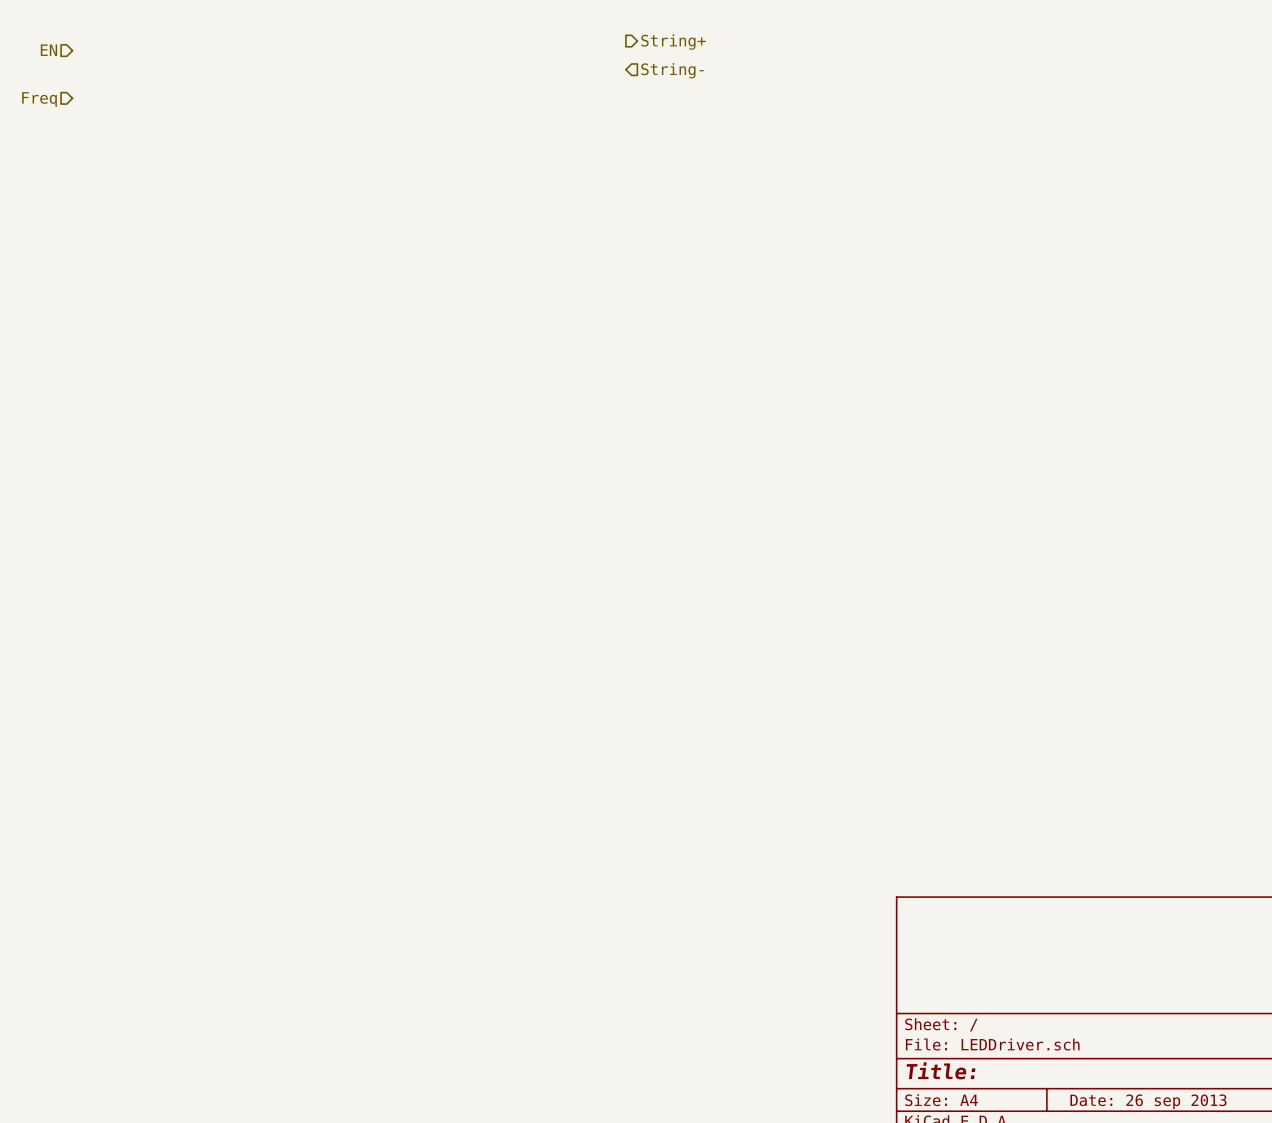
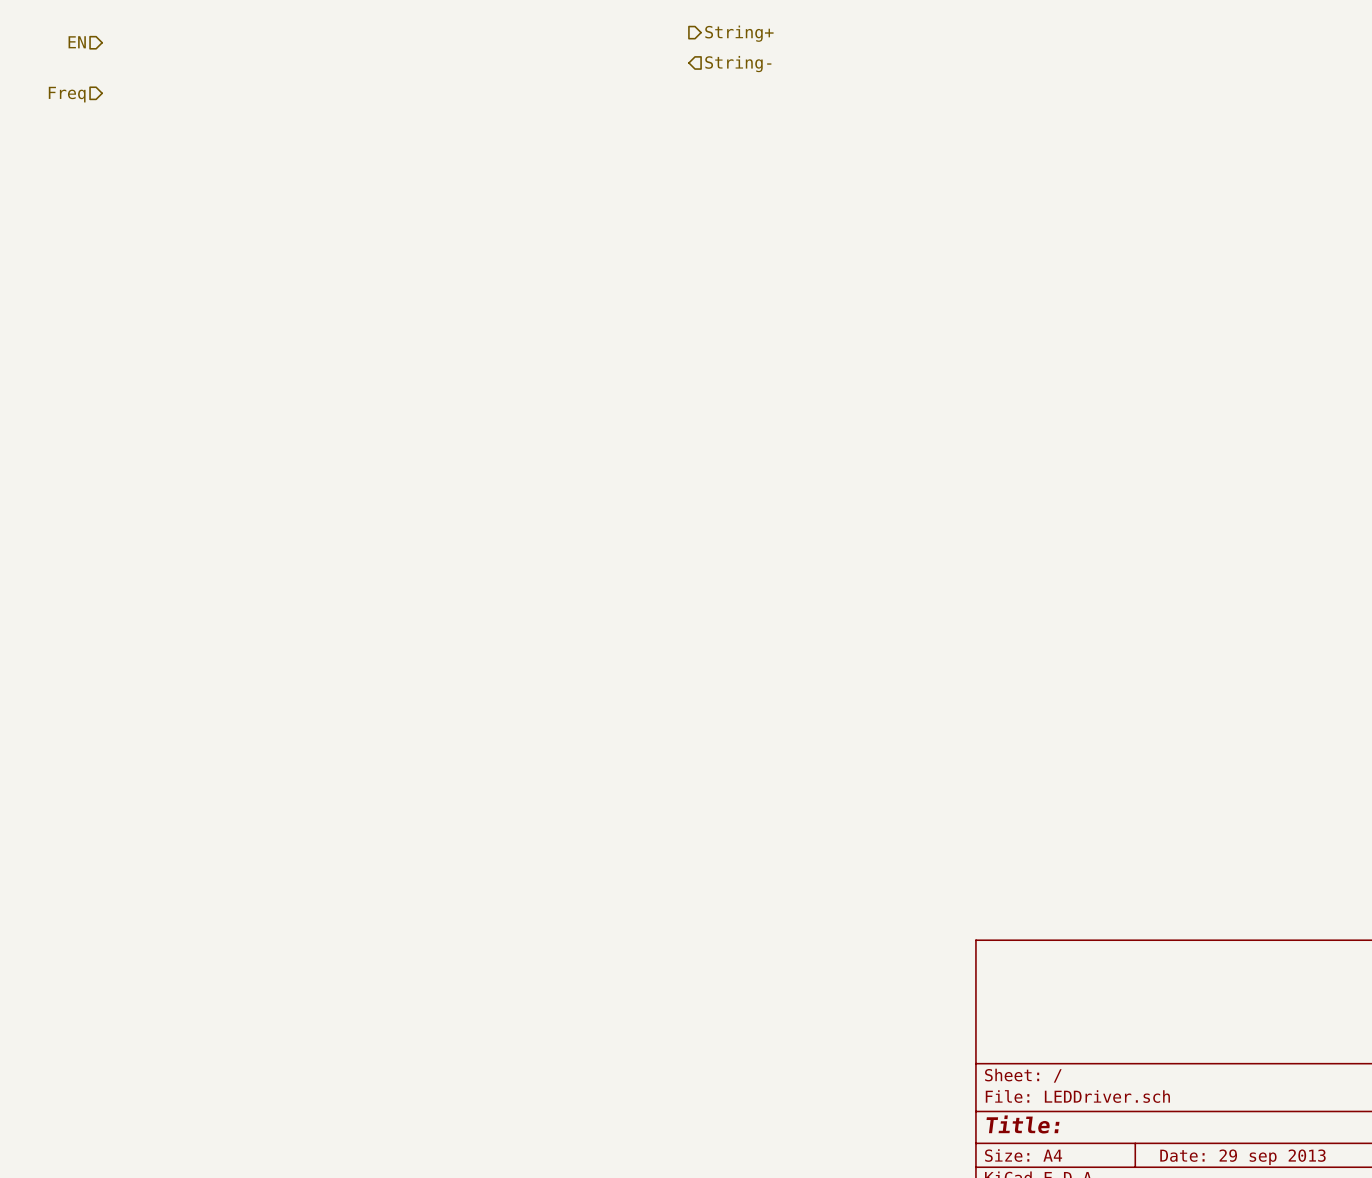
title block: Date: 26 sep 2013 (1148, 1101) -> Date: 29 sep 2013 (1242, 1157)

